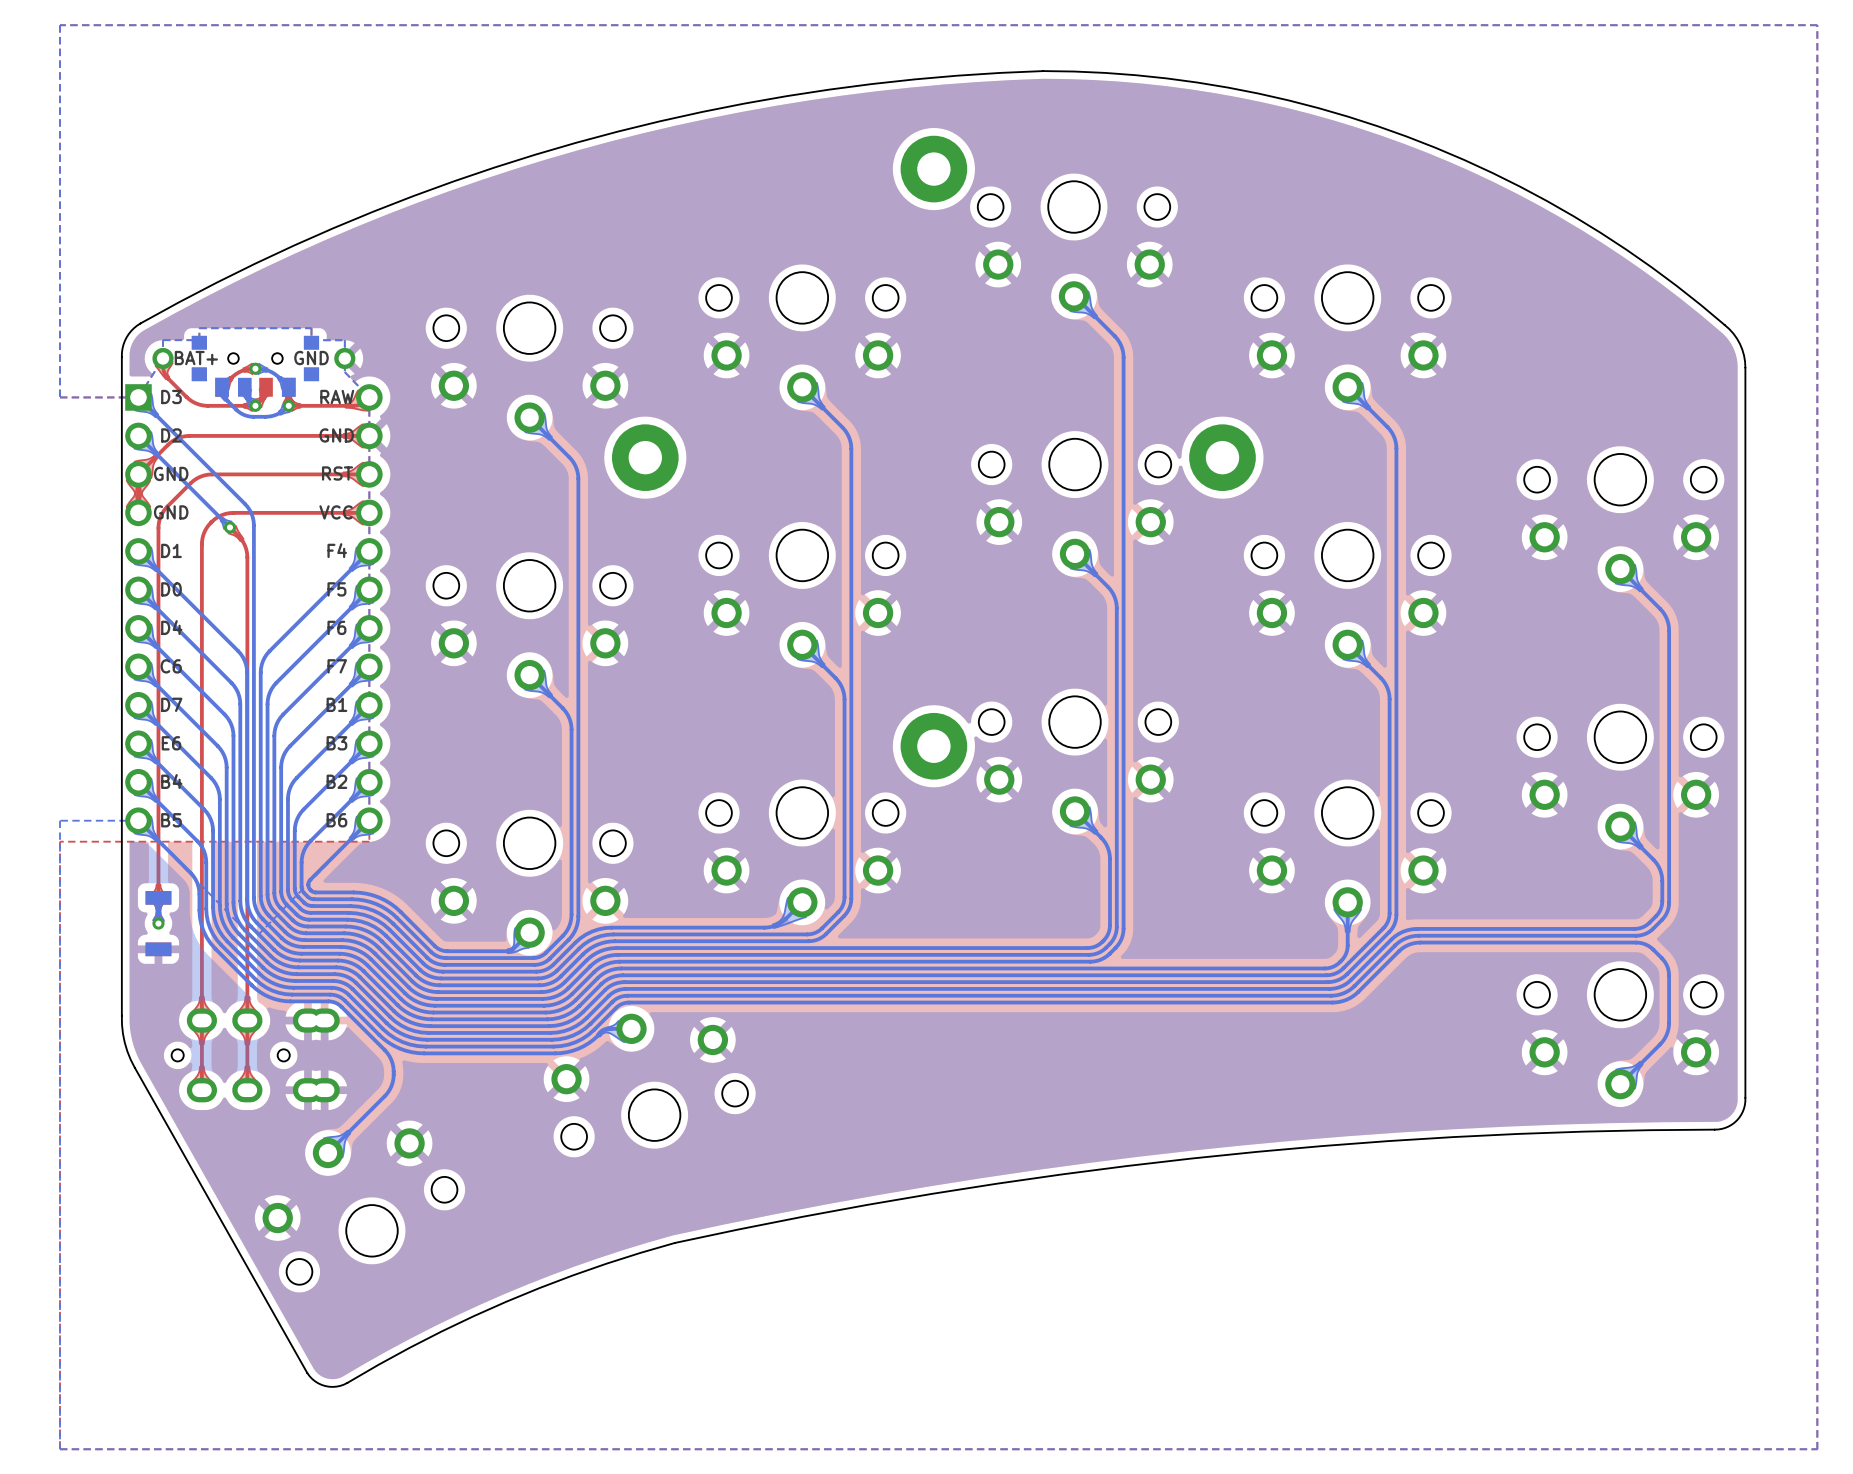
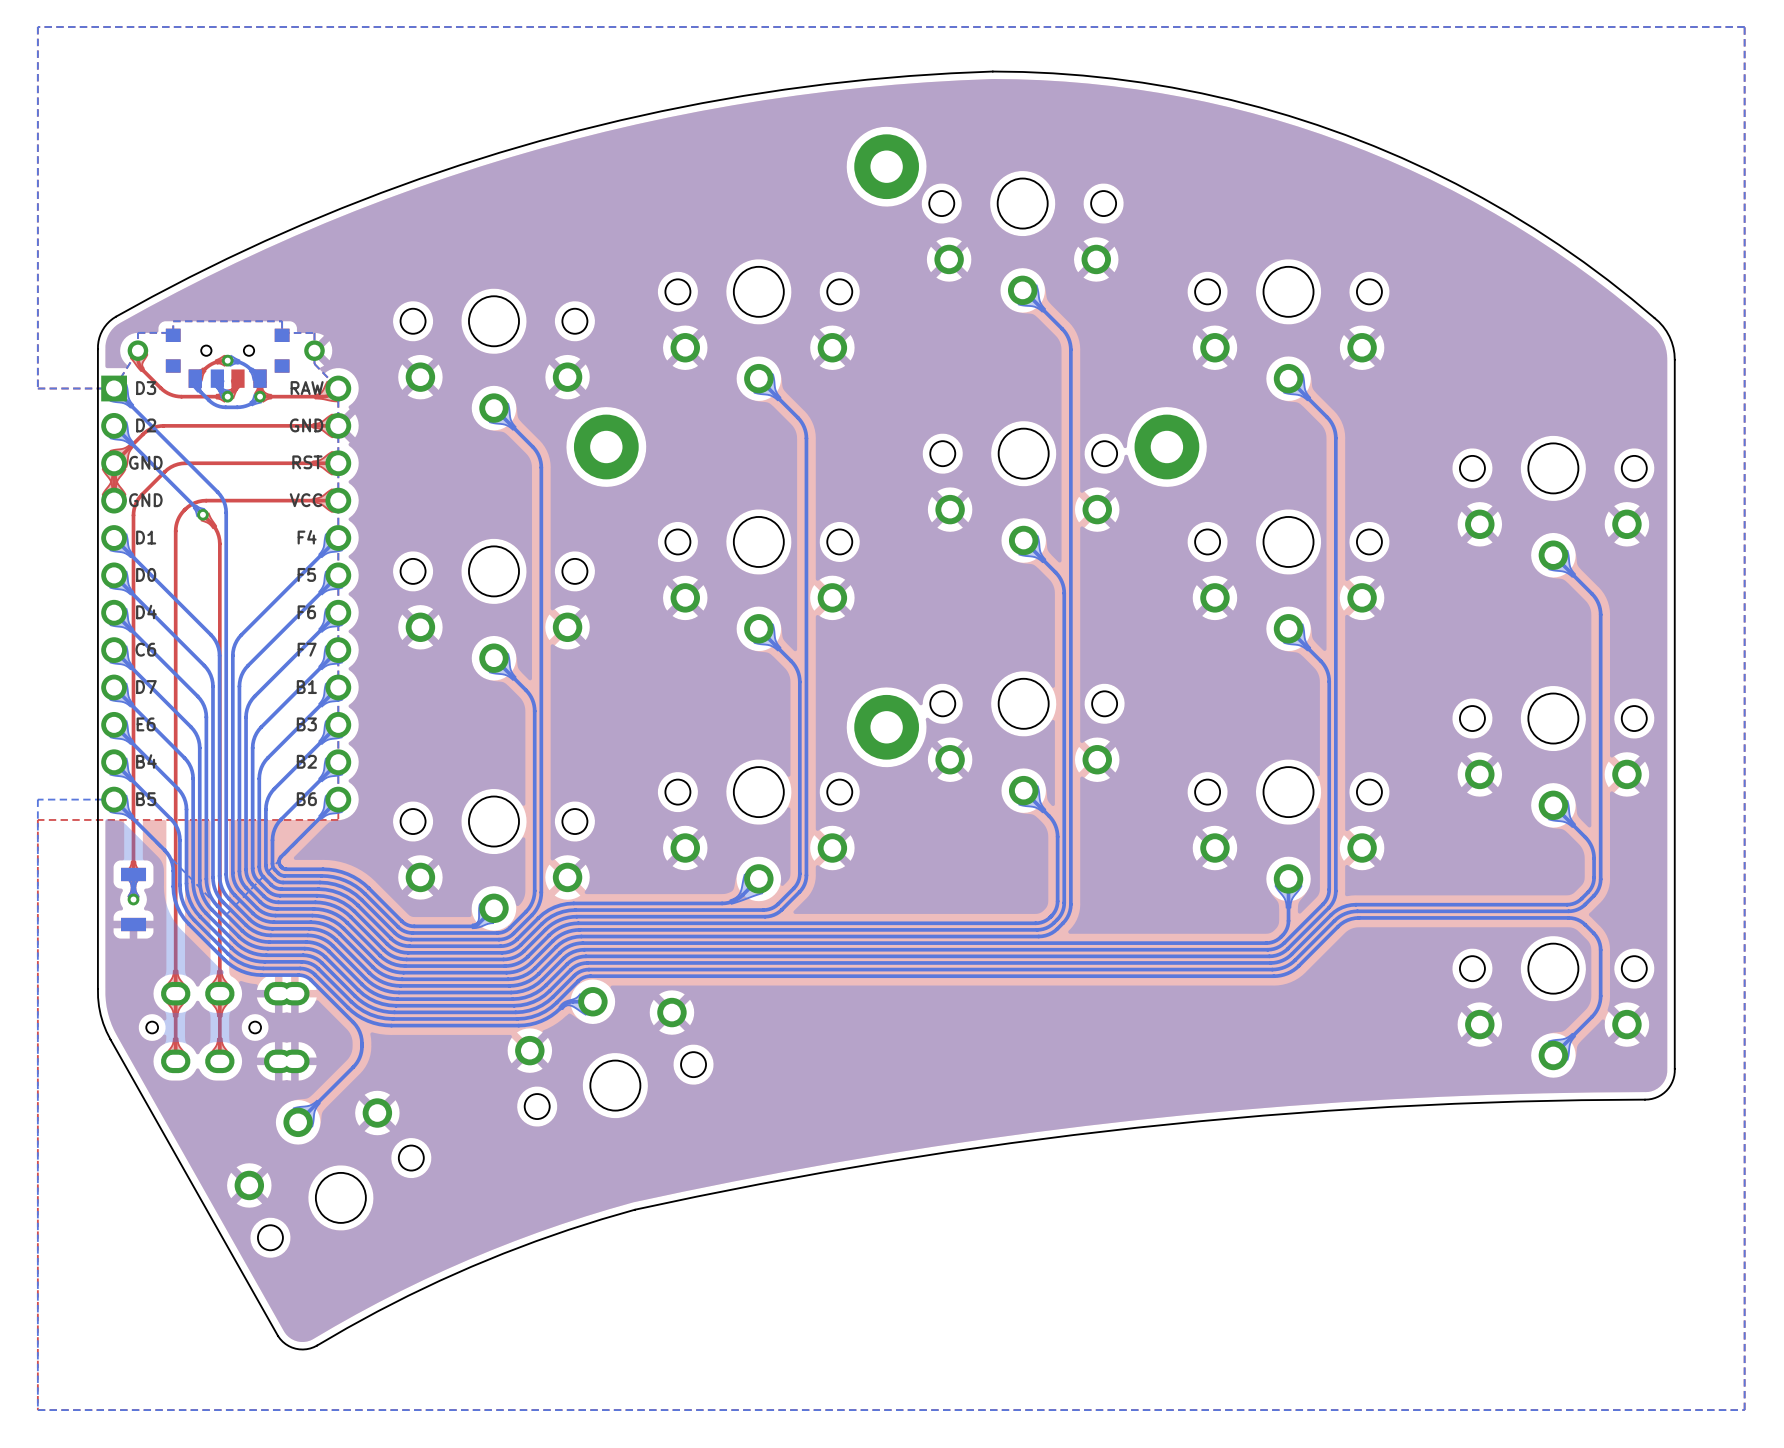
text: BAT+ (196, 358) -> none
text: GND (311, 358) -> none

